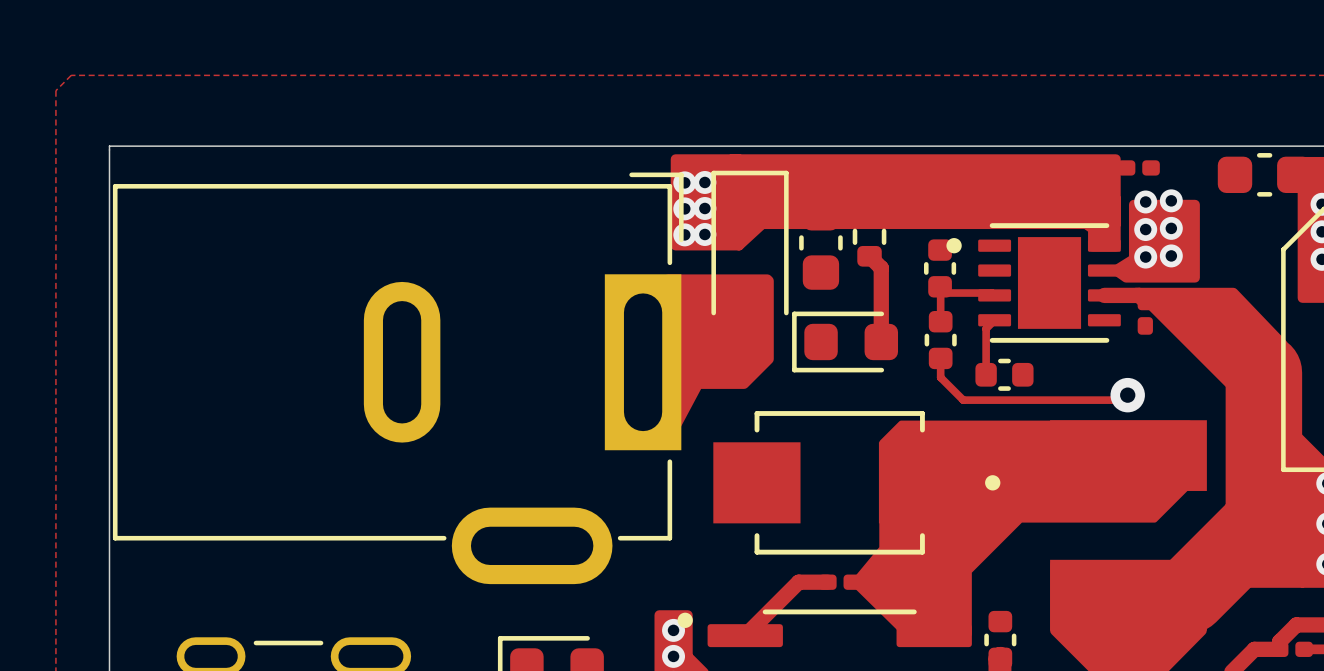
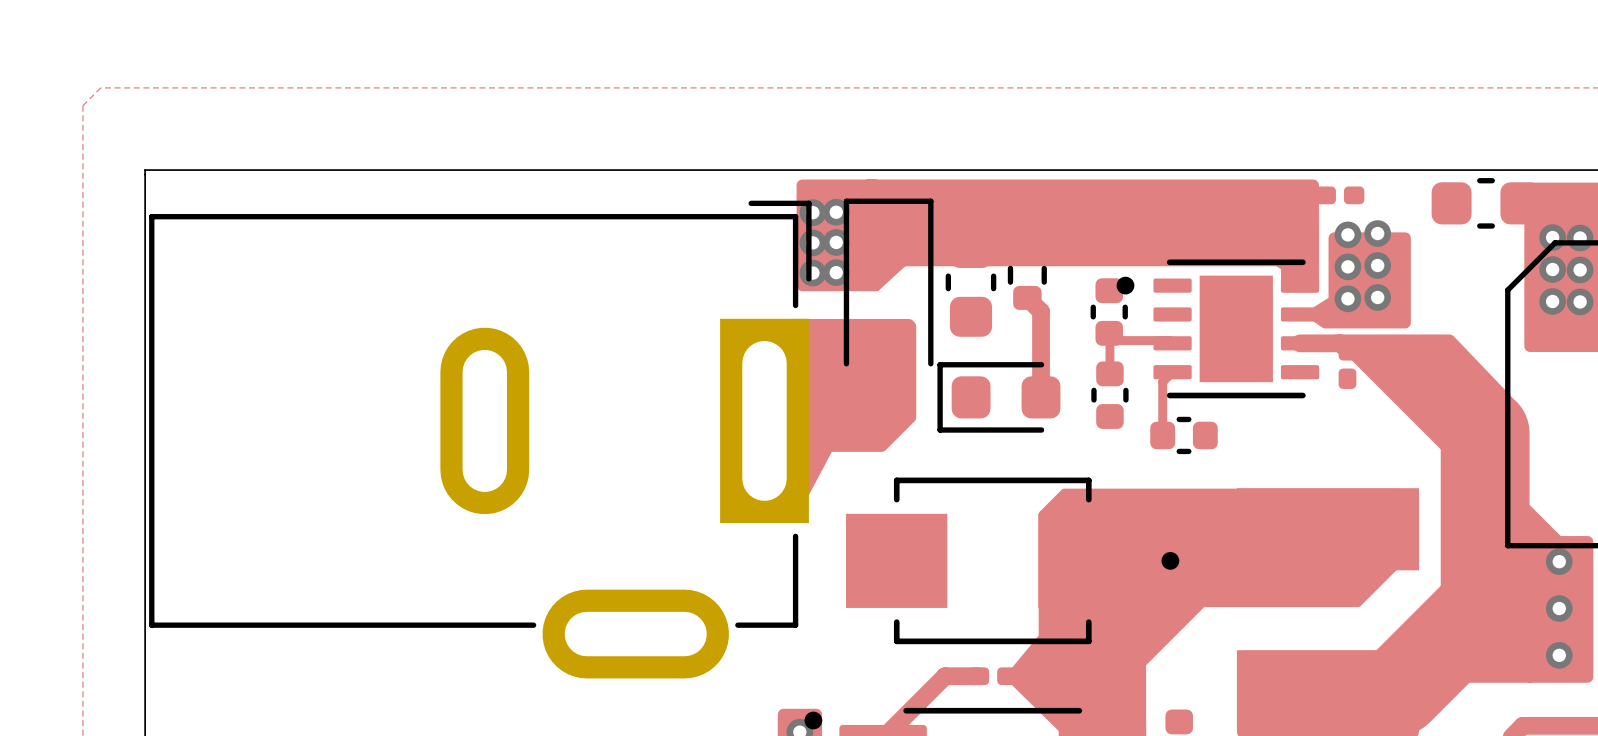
track: (940, 358) (940, 377) (963, 400) (1122, 400) (1127, 395) -> none
via: (1127, 395) -> none

